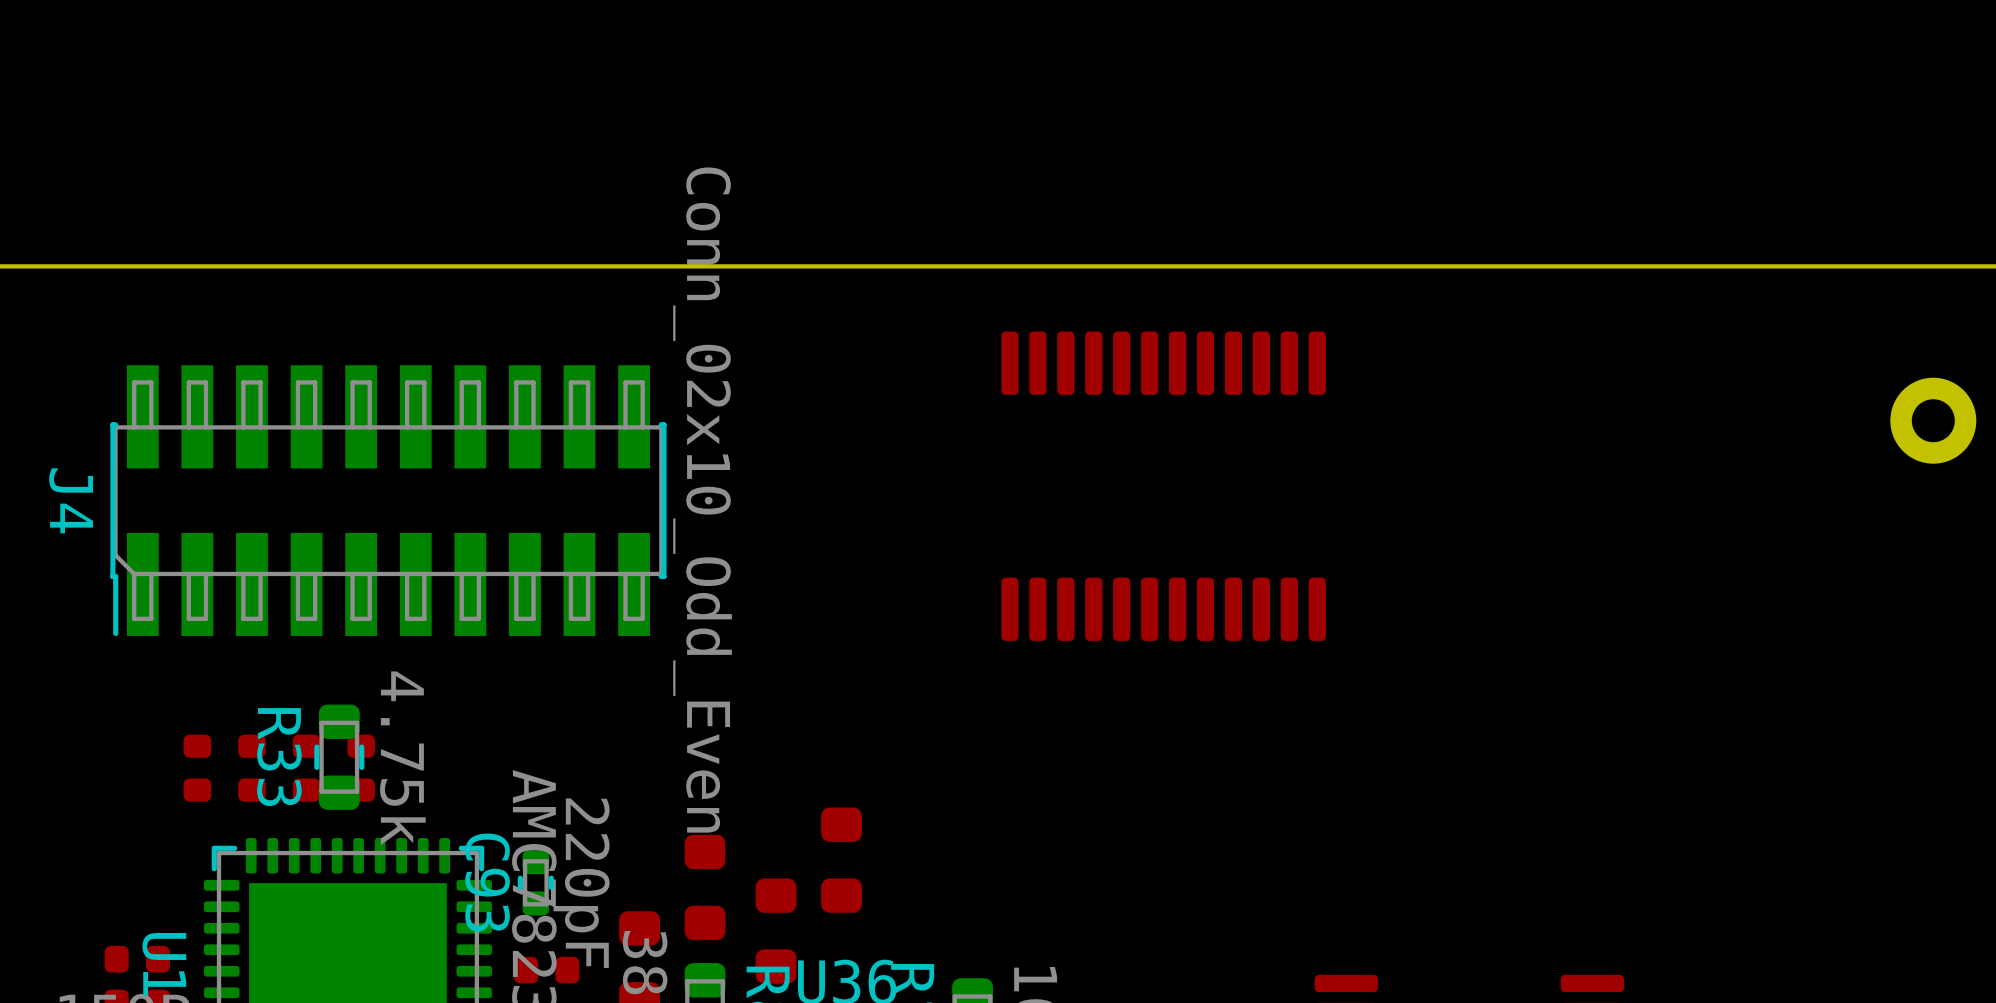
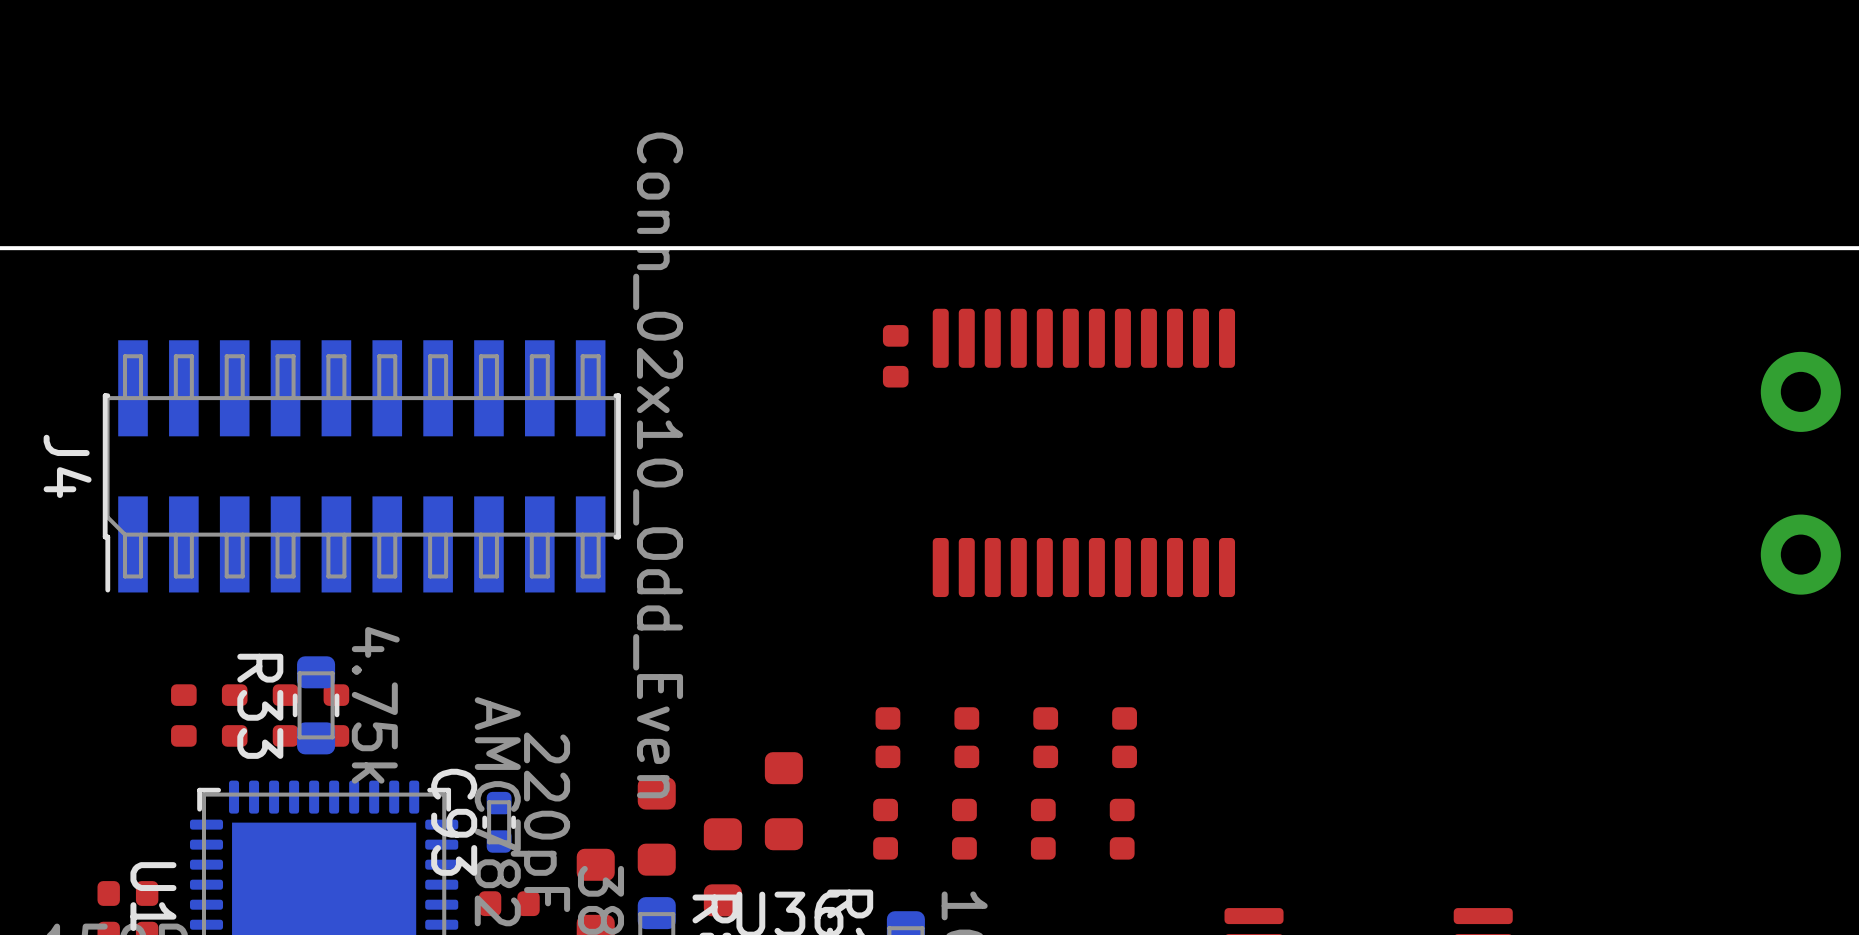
part: none -> (895, 356)
part: none -> (1800, 554)
part: none -> (887, 737)
part: none -> (966, 737)
part: none -> (1045, 737)
part: none -> (1124, 737)
part: none -> (885, 829)
part: none -> (964, 829)
part: none -> (1043, 829)
part: none -> (1122, 829)

